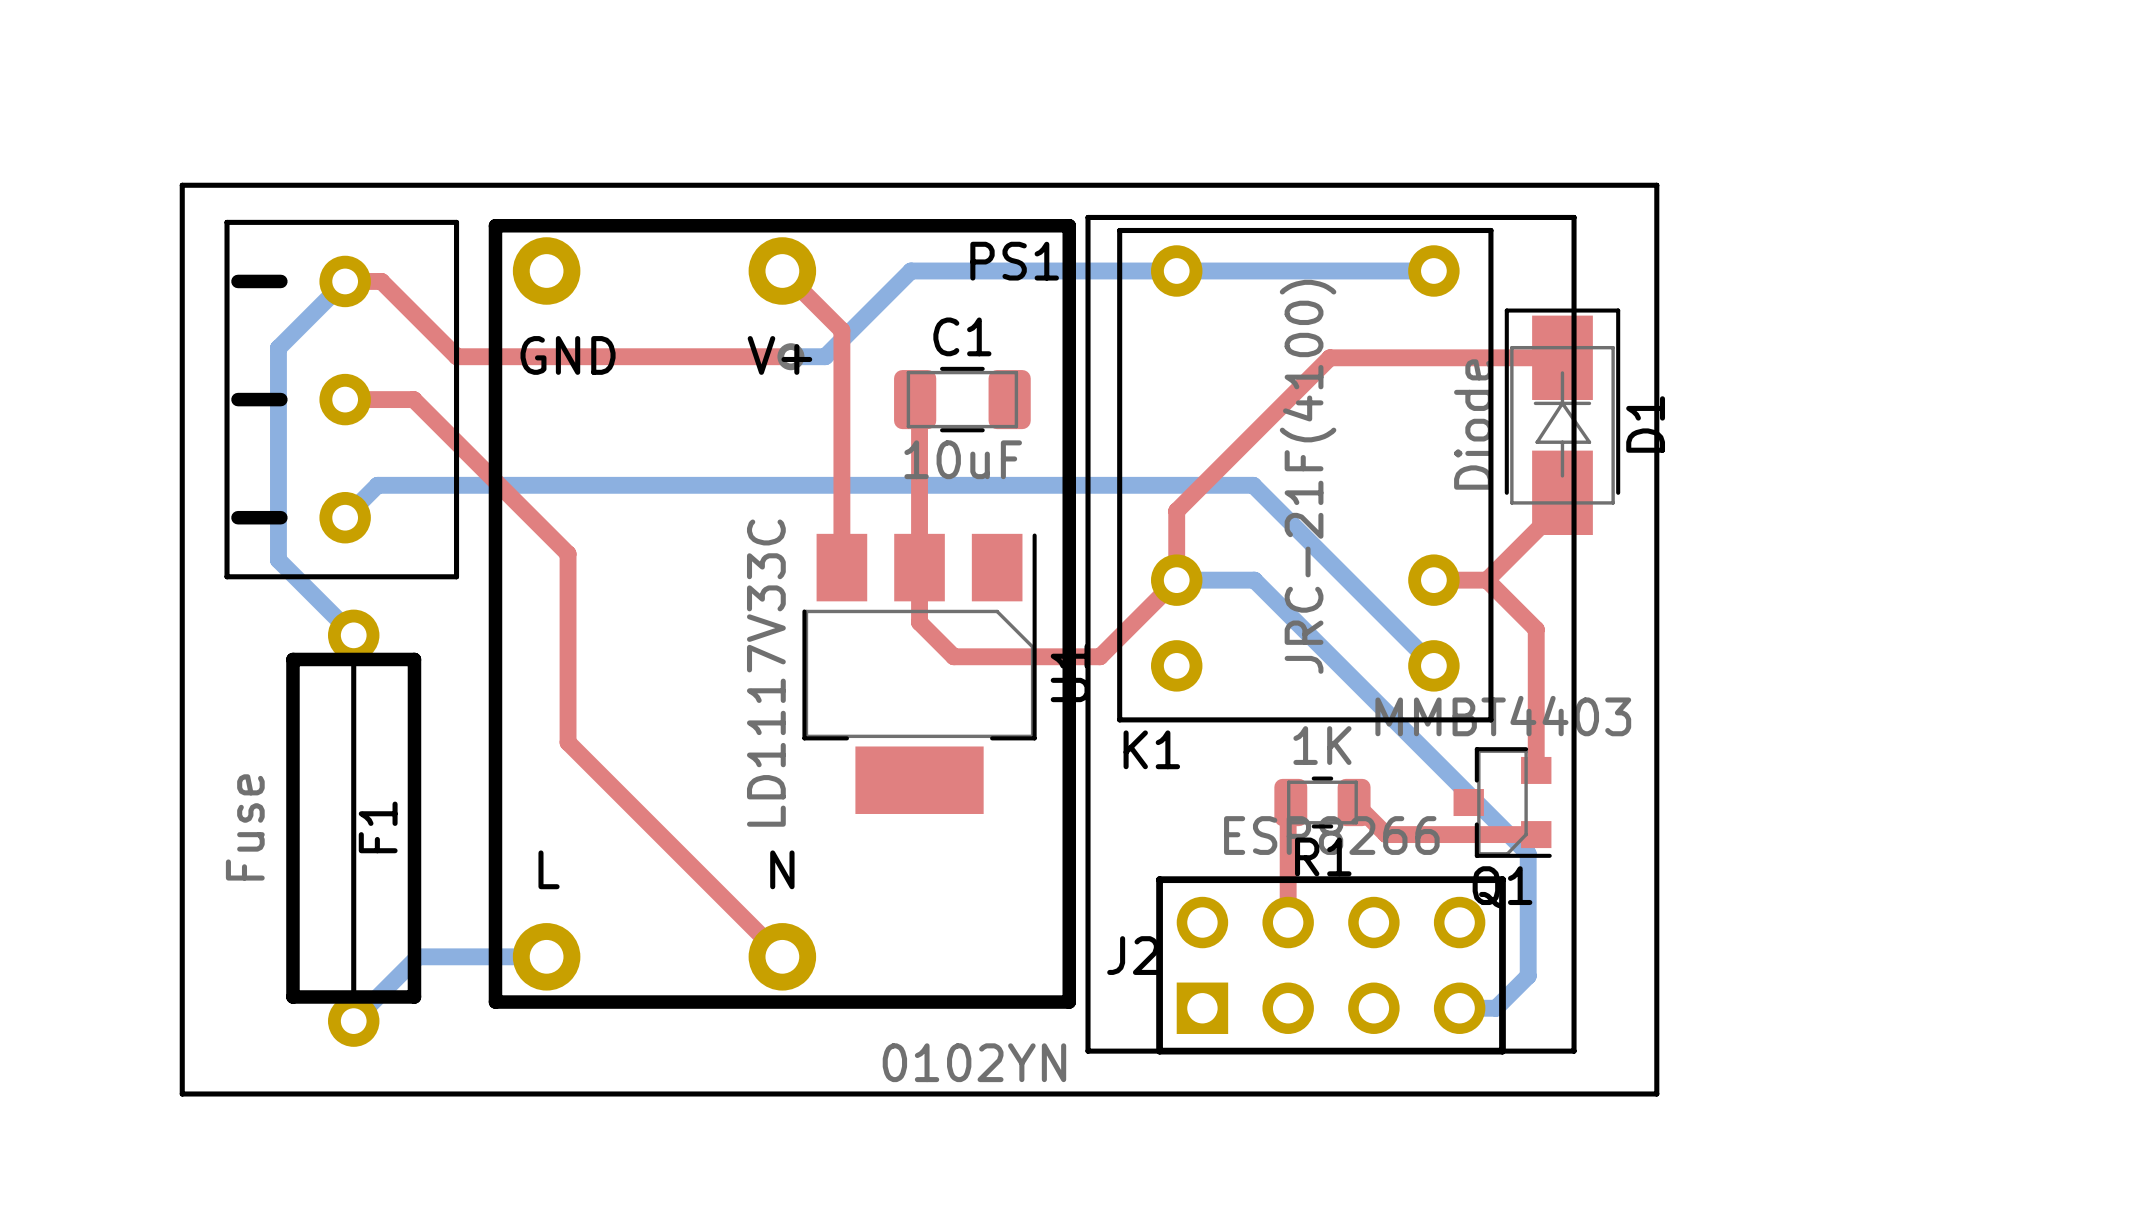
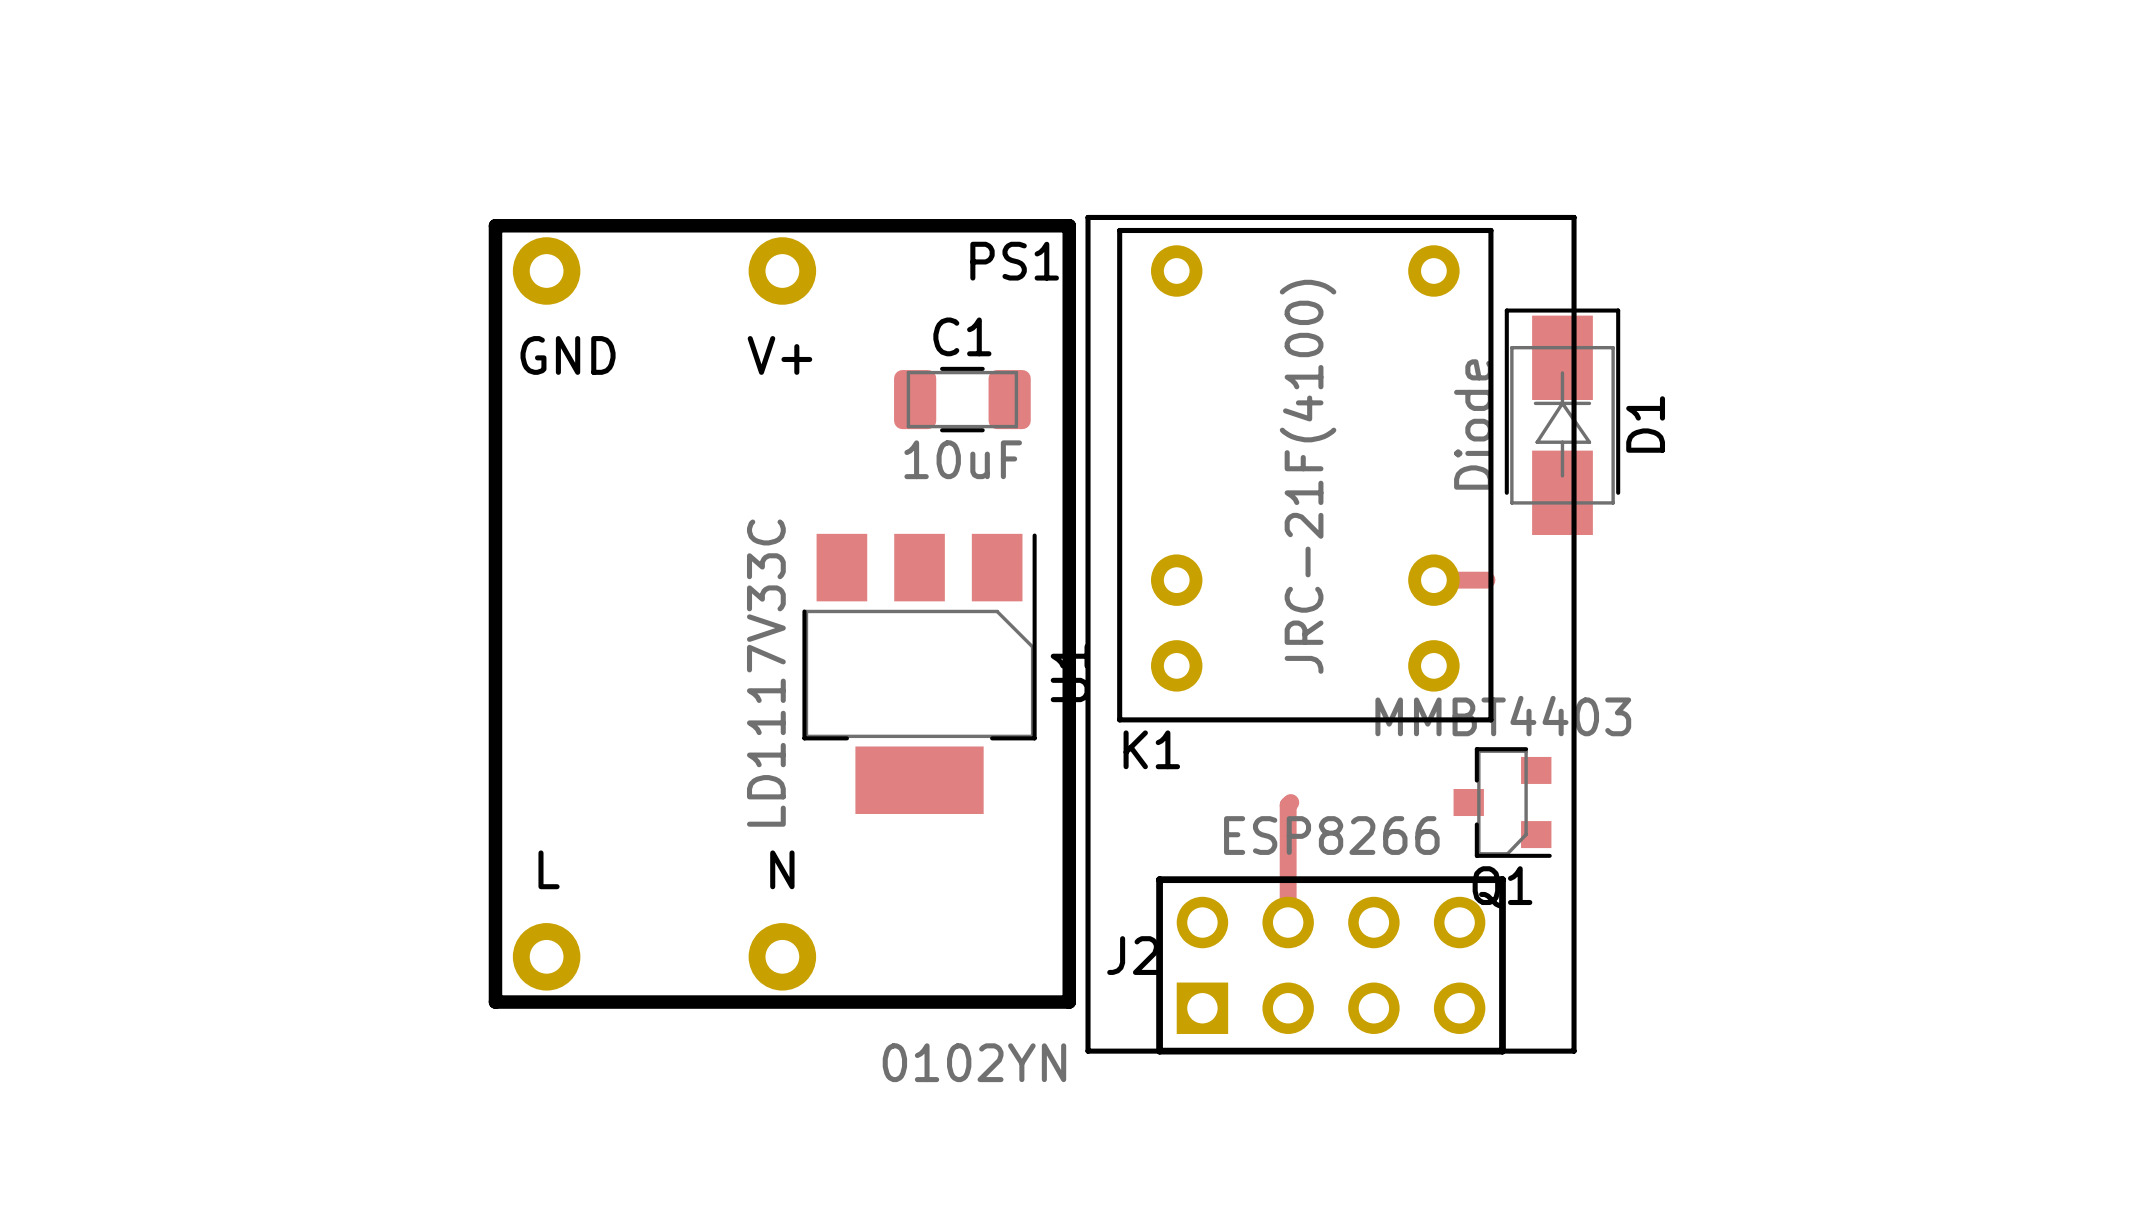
board edge: (182, 185) (182, 1093) (1656, 1093) (1656, 185) (182, 185) -> none
top track: (782, 270) (841, 330) (841, 567) -> none
bottom track: (1433, 270) (910, 270) (825, 356) (790, 356) -> none
bottom track: (345, 281) (278, 348) (278, 560) (353, 635) -> none
top track: (345, 281) (381, 281) (456, 356) (790, 356) -> none
via: (790, 356) -> none
top track: (1562, 357) (1329, 357) (1176, 511) (1176, 580) (1100, 656) (953, 656) (919, 622) (919, 403) (915, 399) -> none
part: (341, 399) -> none
top track: (345, 399) (413, 399) (568, 553) (568, 742) (782, 956) -> none
top track: (1562, 492) (1562, 504) (1486, 580) (1536, 629) (1536, 770) -> none
bottom track: (345, 517) (377, 485) (1253, 485) (1433, 665) -> none
bottom track: (1176, 580) (1254, 580) (1528, 853) (1528, 976) (1495, 1008) (1459, 1008) -> none
R1: 1K (1322, 802) -> none
top track: (1354, 802) (1386, 834) (1536, 834) -> none
F1: Fuse (353, 828) -> none
bottom track: (546, 956) (418, 956) (353, 1021) -> none

